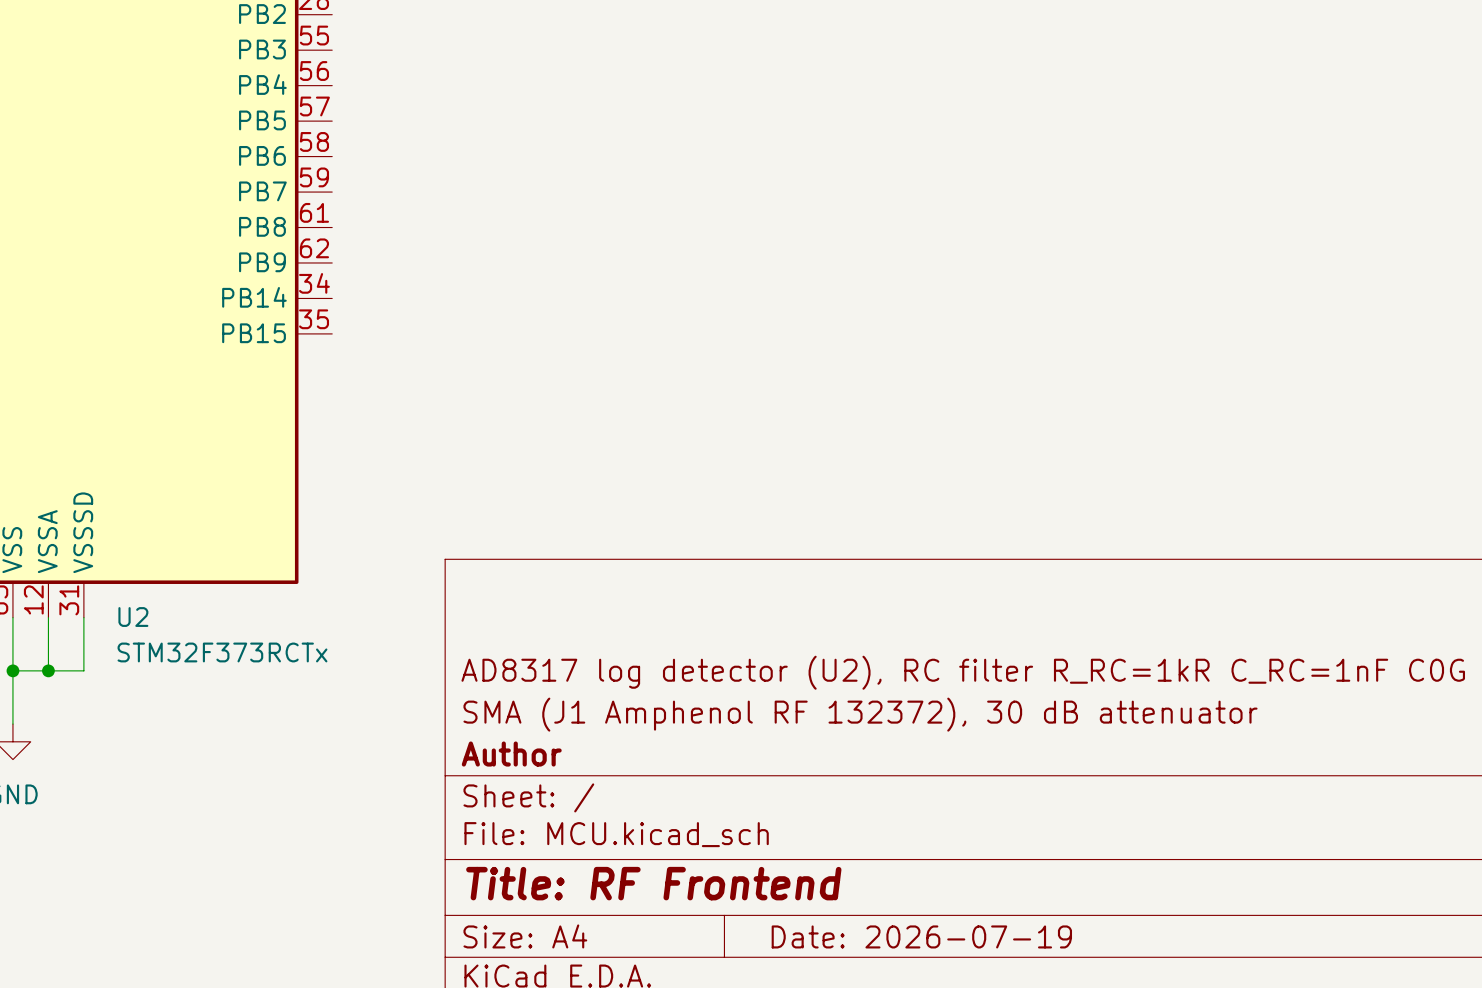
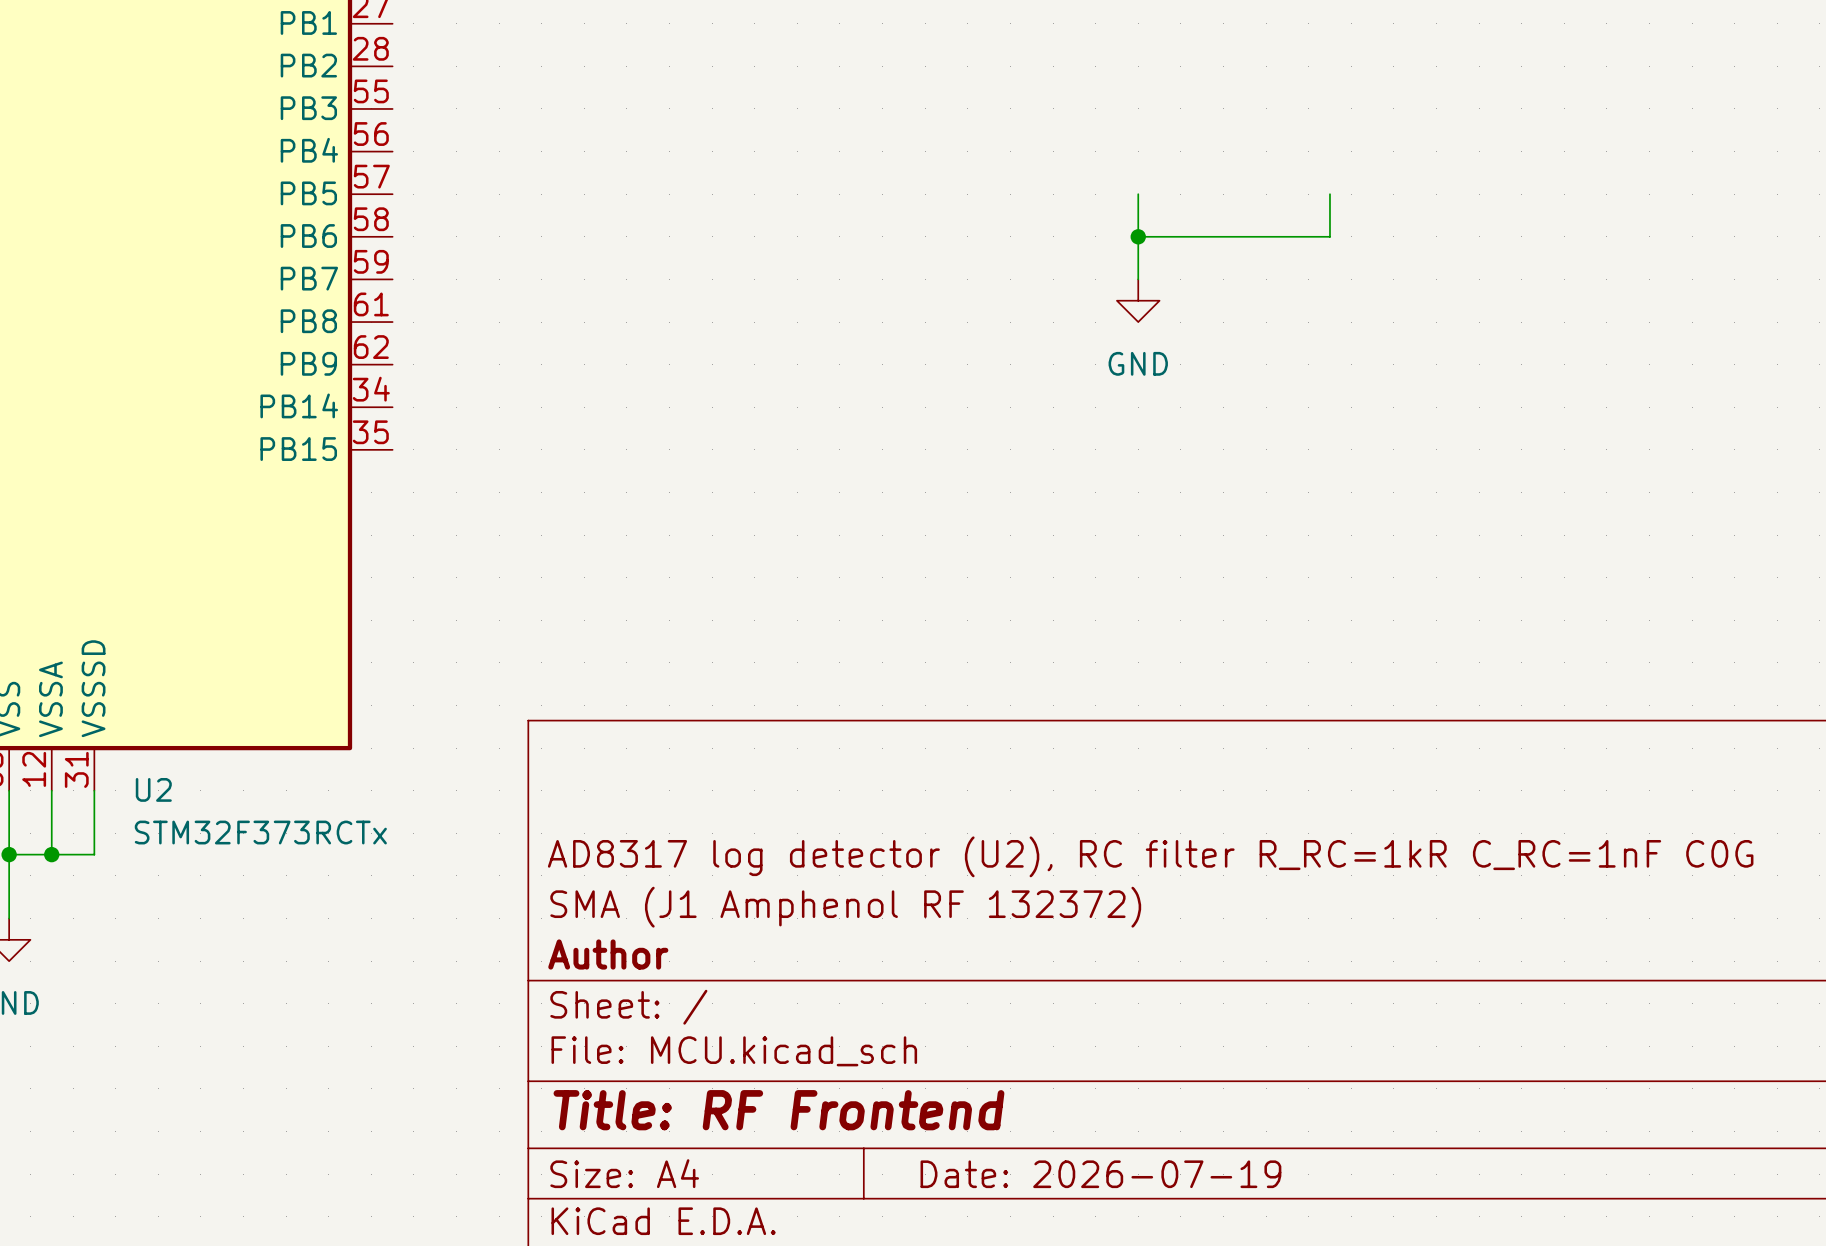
wire: none -> (1138, 194) (1138, 279)
wire: none -> (1329, 194) (1329, 236) (1138, 236)
junction: none -> (1138, 236)
power symbol: none -> GND (1138, 300)
title block: SMA (J1 Amphenol RF 132372), 30 dB attenuator (860, 714) -> SMA (J1 Amphenol RF 132372) (845, 907)

